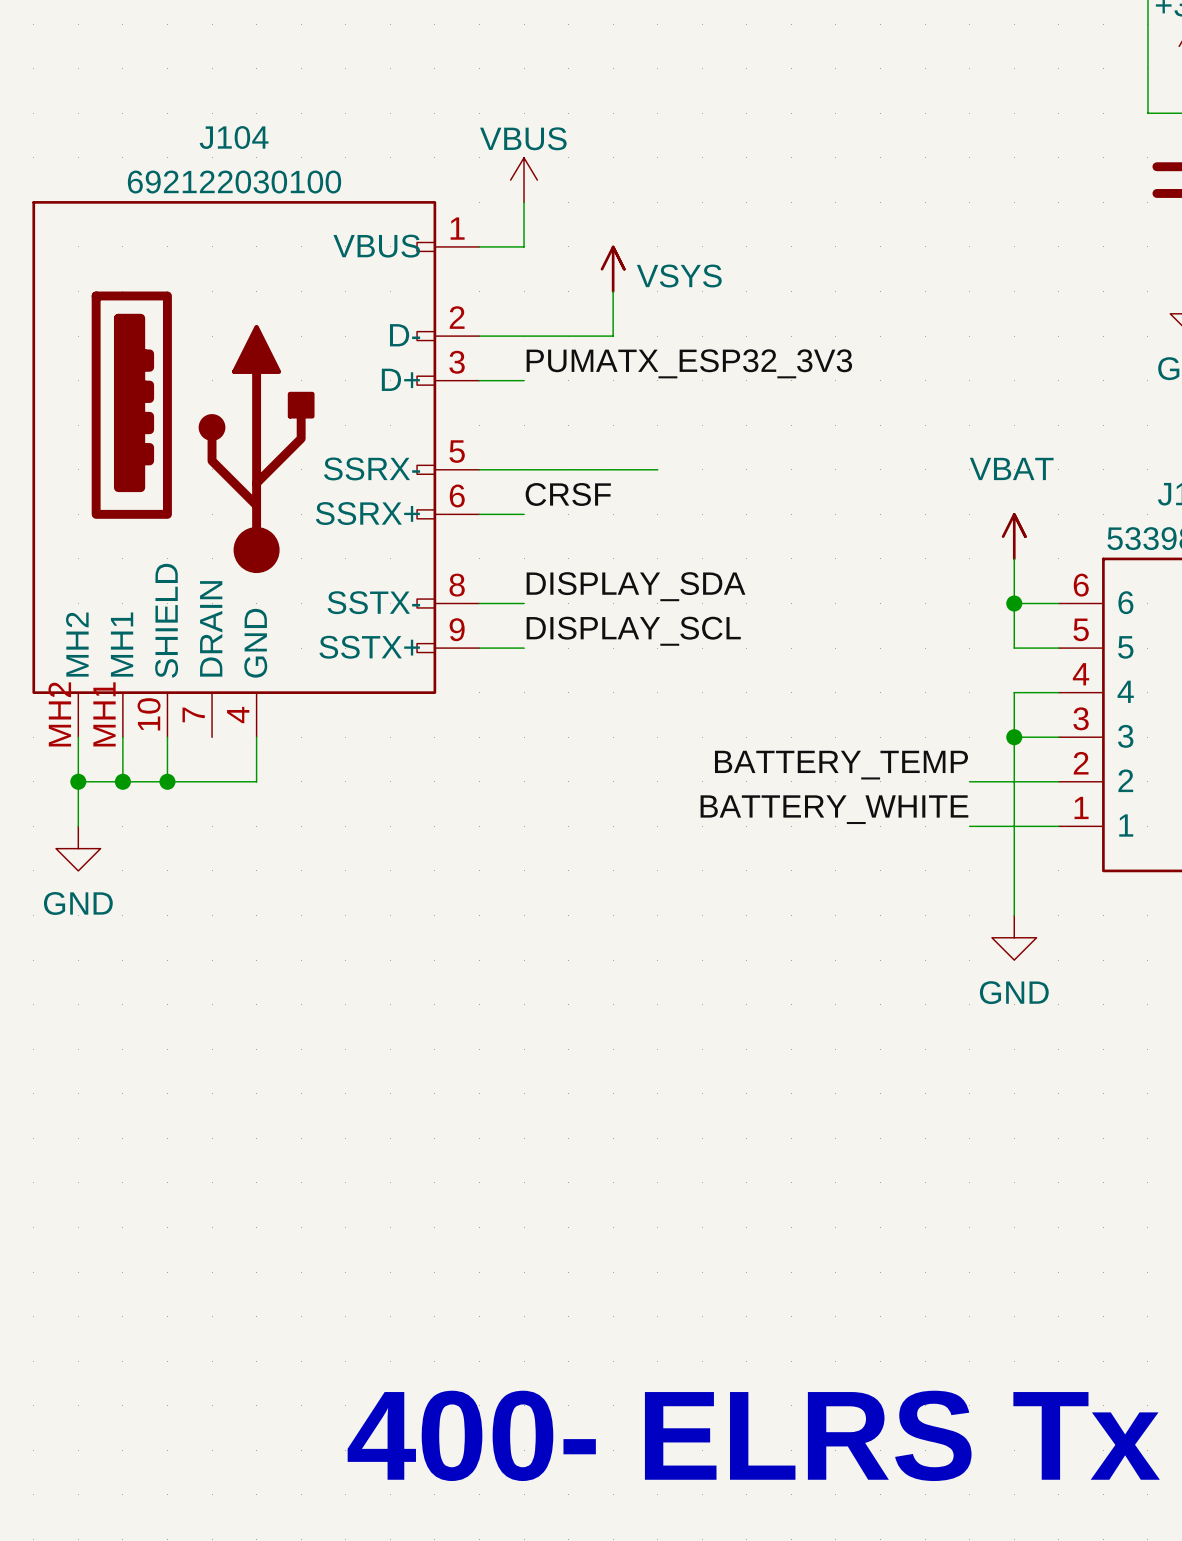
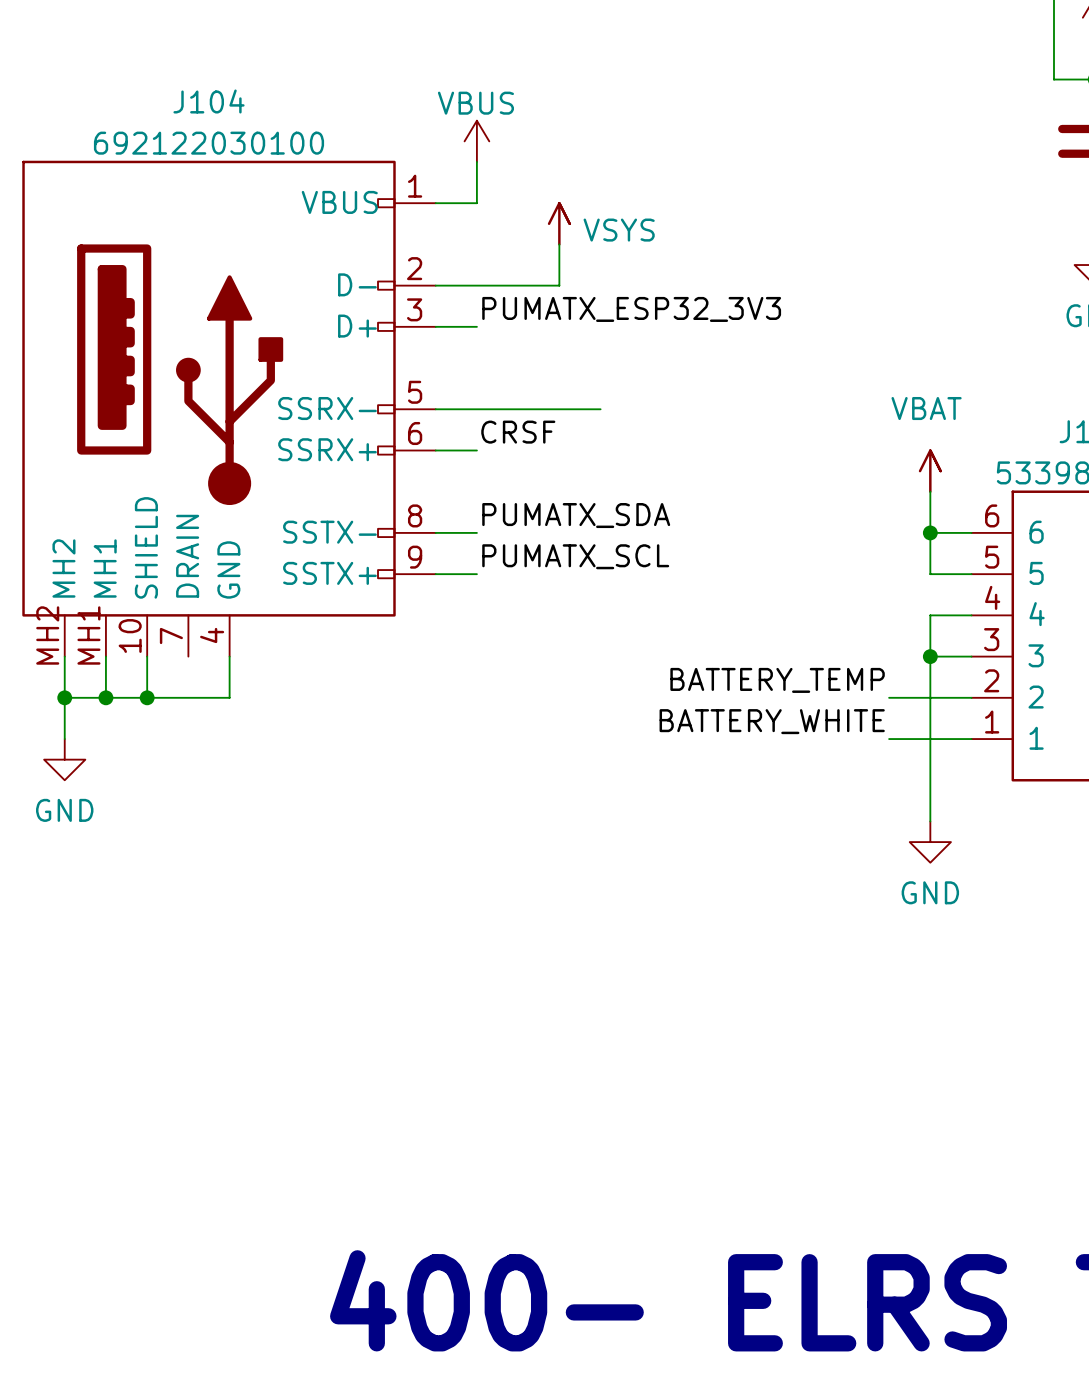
label: DISPLAY_SDA (636, 586) -> PUMATX_SDA (576, 515)
label: DISPLAY_SCL (633, 631) -> PUMATX_SCL (575, 556)

